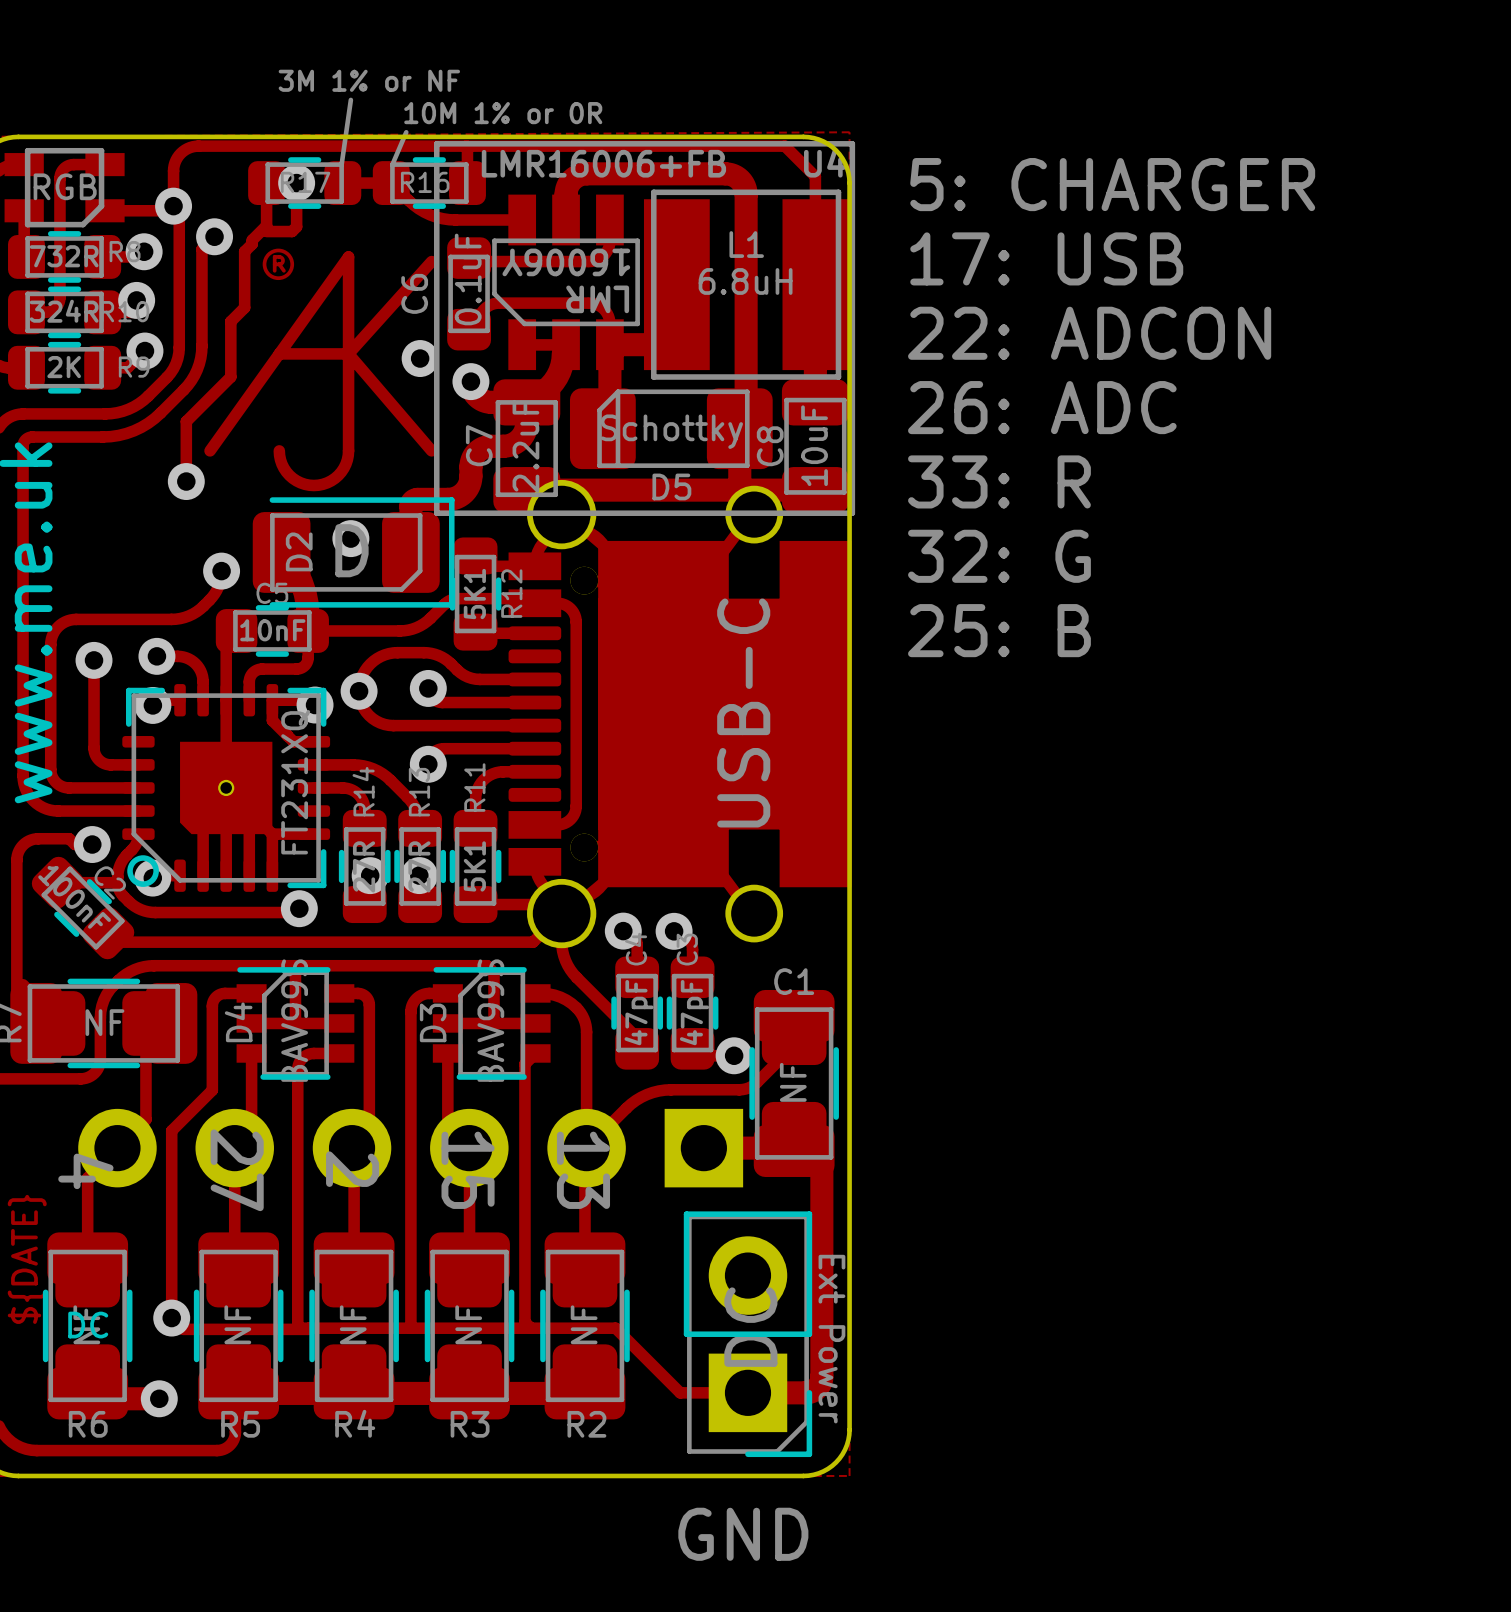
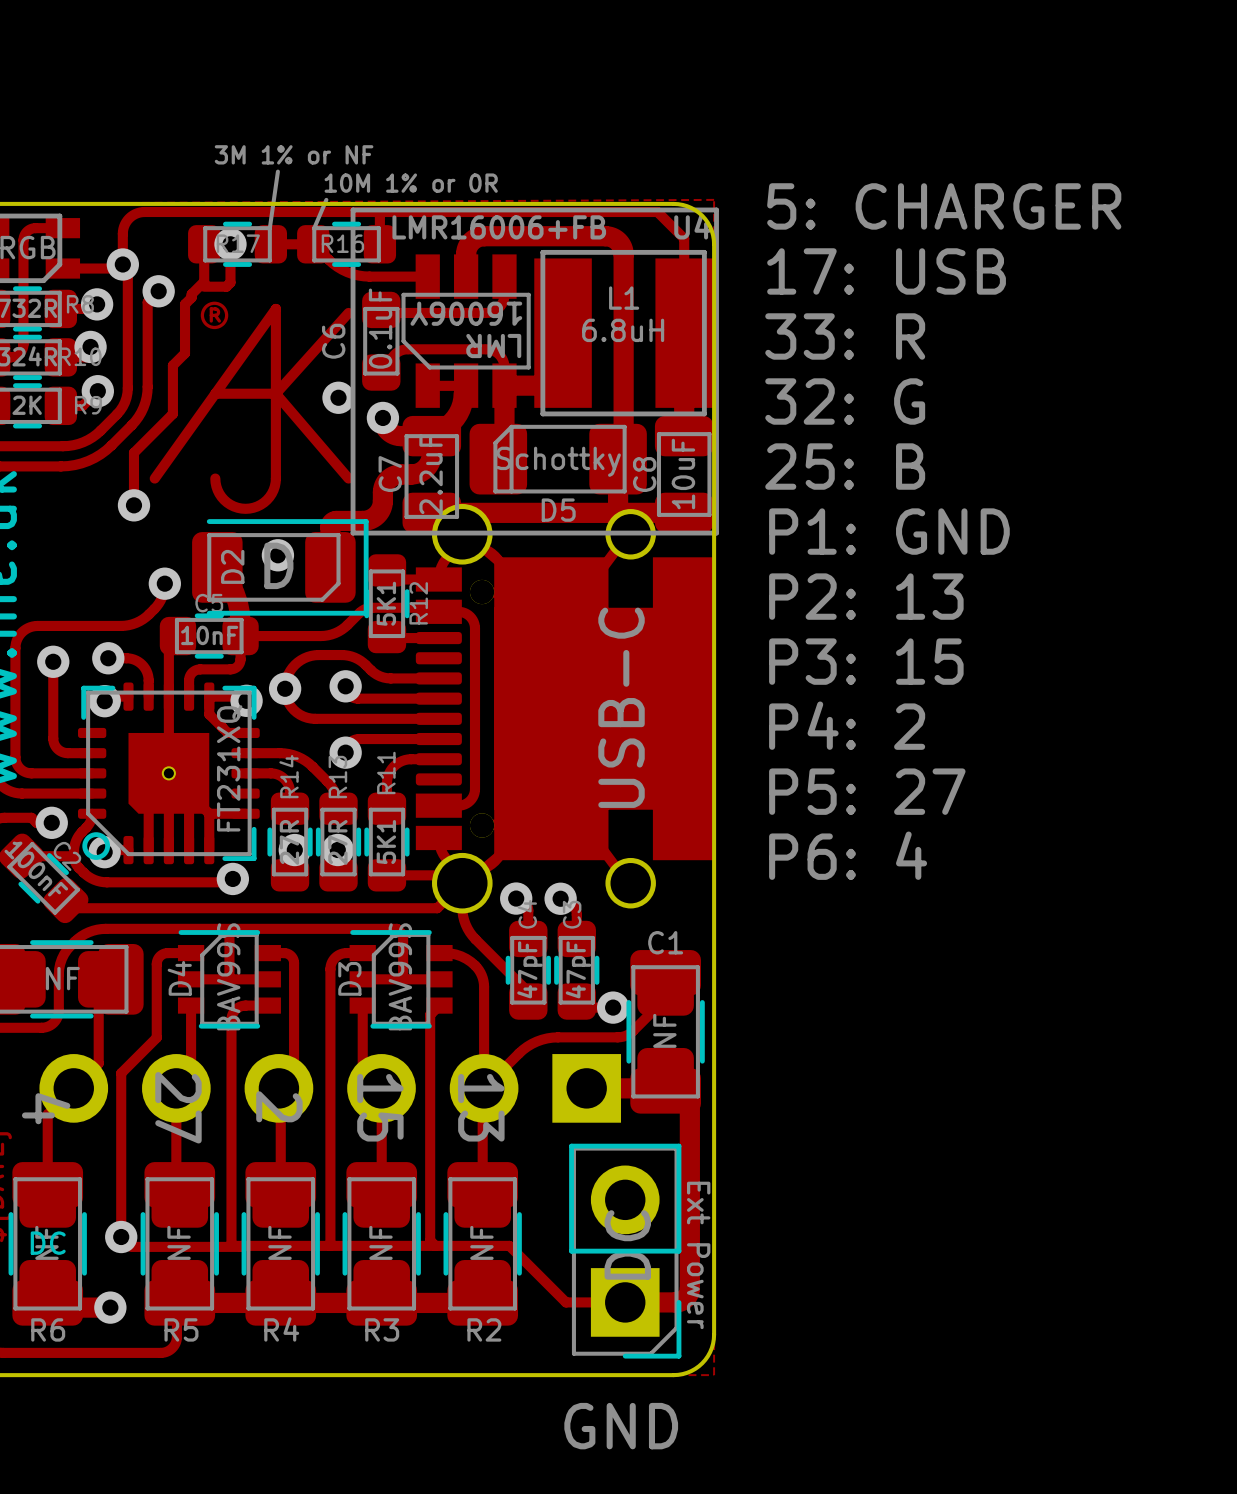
text position: 5: CHARGER (1112, 184) -> 5: CHARGER (944, 206)
text position: 17: USB (1046, 258) -> 17: USB (886, 271)
text: 22: ADCON (1089, 333) -> none
text: 26: ADC (1042, 407) -> none
text position: 33: R (999, 481) -> 33: R (845, 336)
text: none -> P1: GND (889, 531)
text position: 32: G (999, 556) -> 32: G (845, 401)
text: none -> P2: 13 (866, 596)
text position: 25: B (999, 630) -> 25: B (845, 466)
text: none -> P3: 15 (866, 661)
text: none -> P4: 2 (847, 725)
text: none -> P5: 27 (867, 791)
text: none -> P6: 4 (848, 855)

